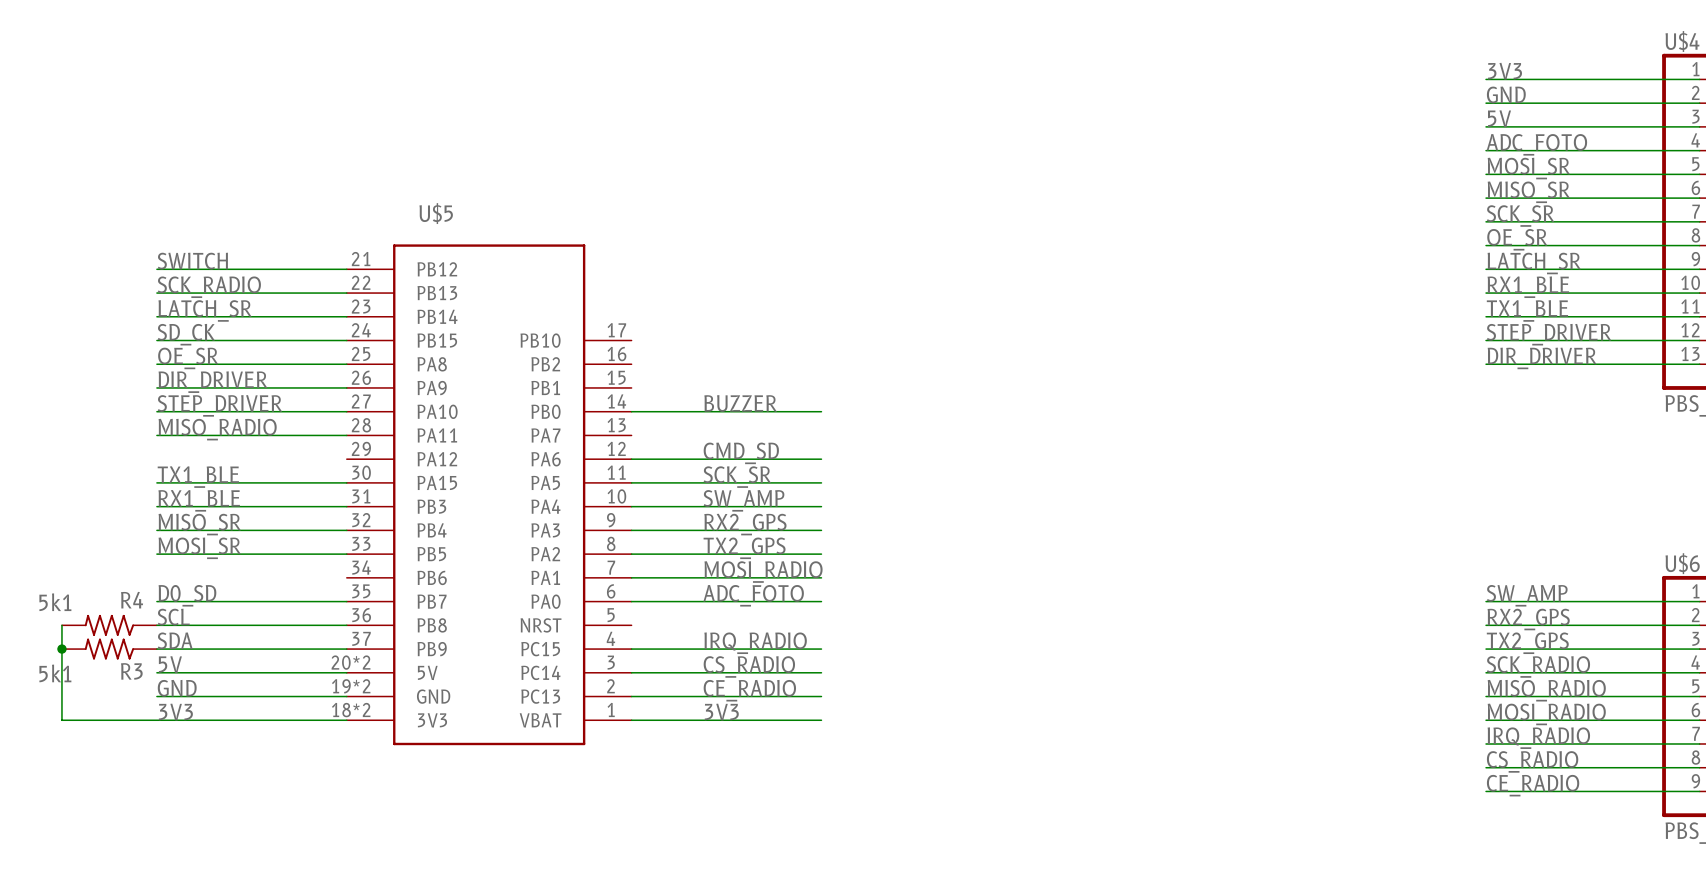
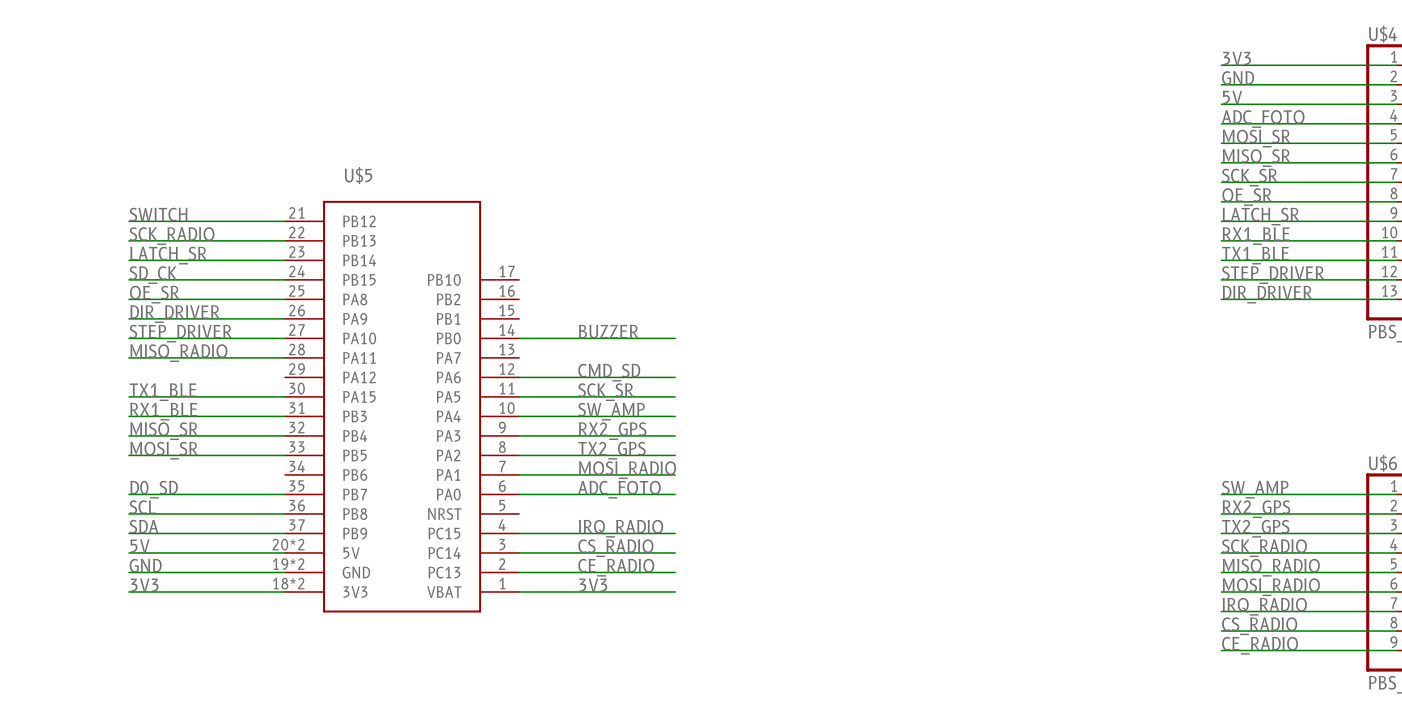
wire: (61, 625) (61, 720) (156, 720) -> none
R4: 5k1 (109, 625) -> none
junction: (61, 649) -> none
R3: 5k1 (109, 649) -> none

